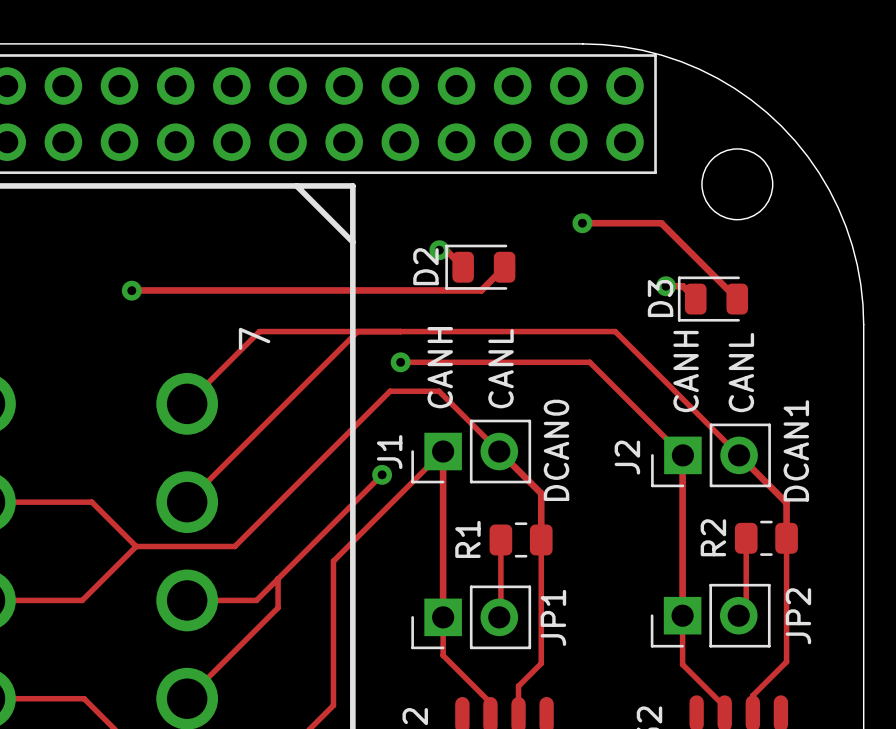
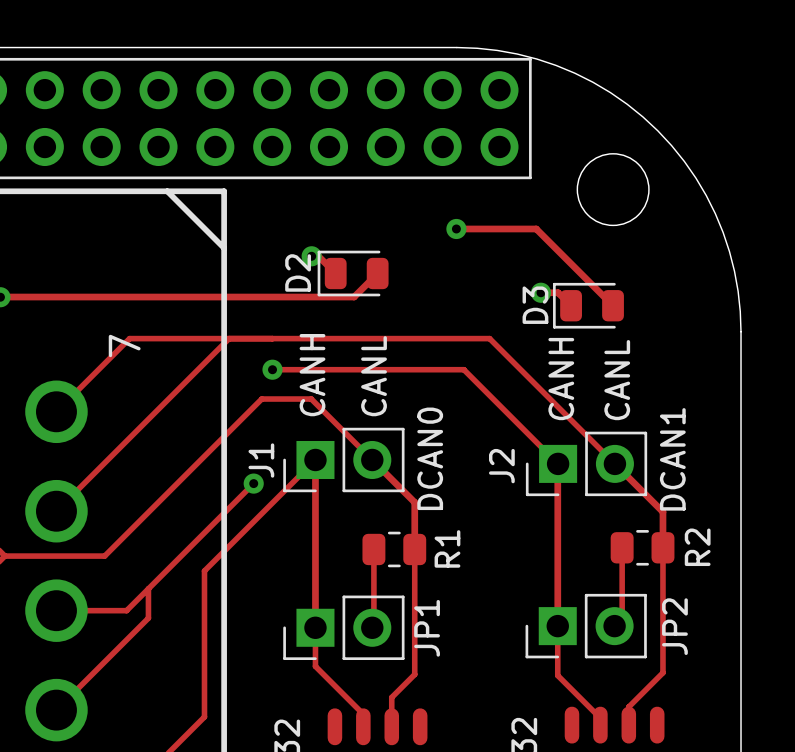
R2 name position: R2 (713, 537) -> R2 (697, 547)
R1 name position: R1 (467, 539) -> R1 (447, 548)

